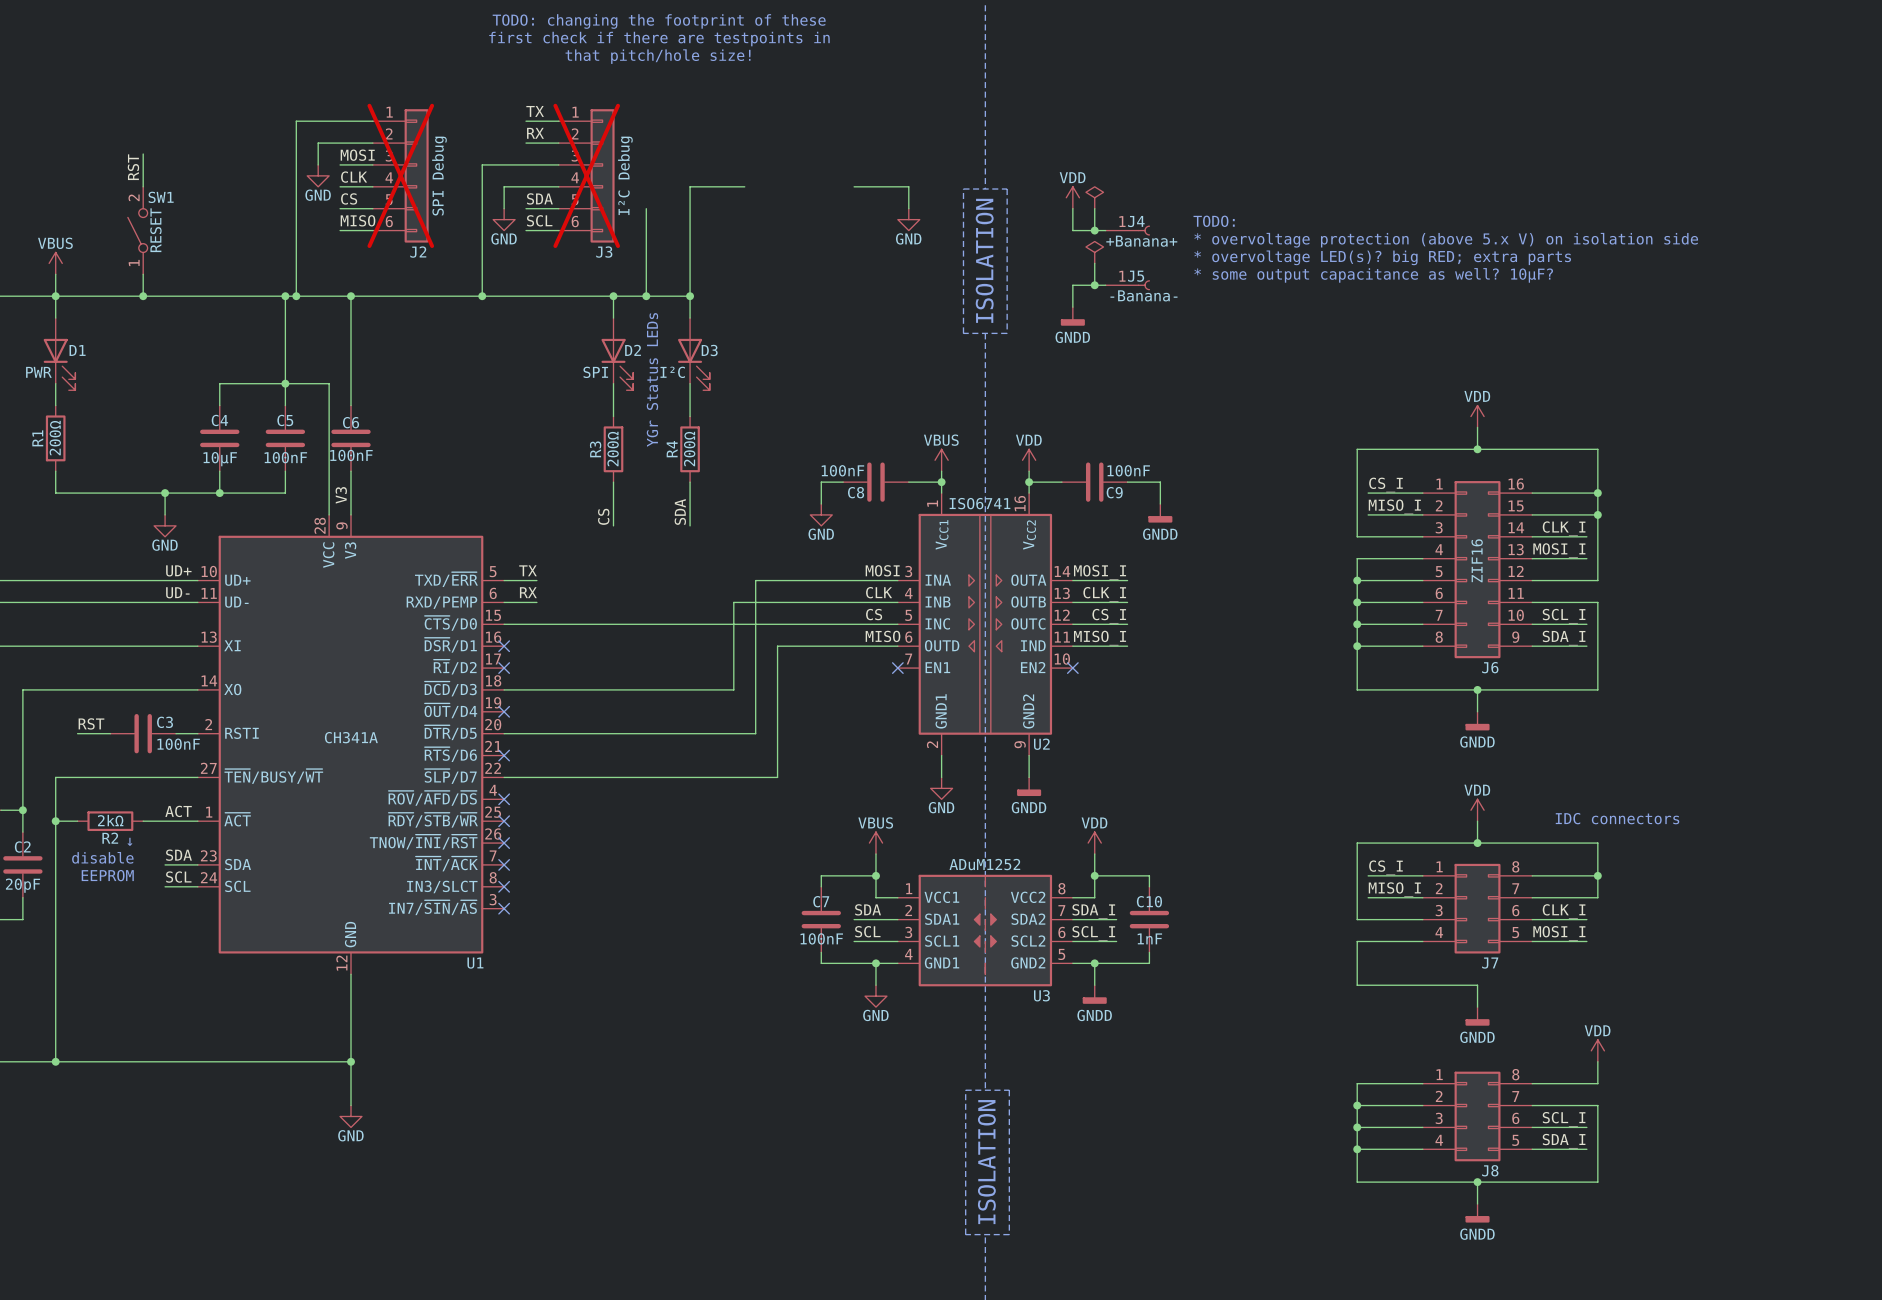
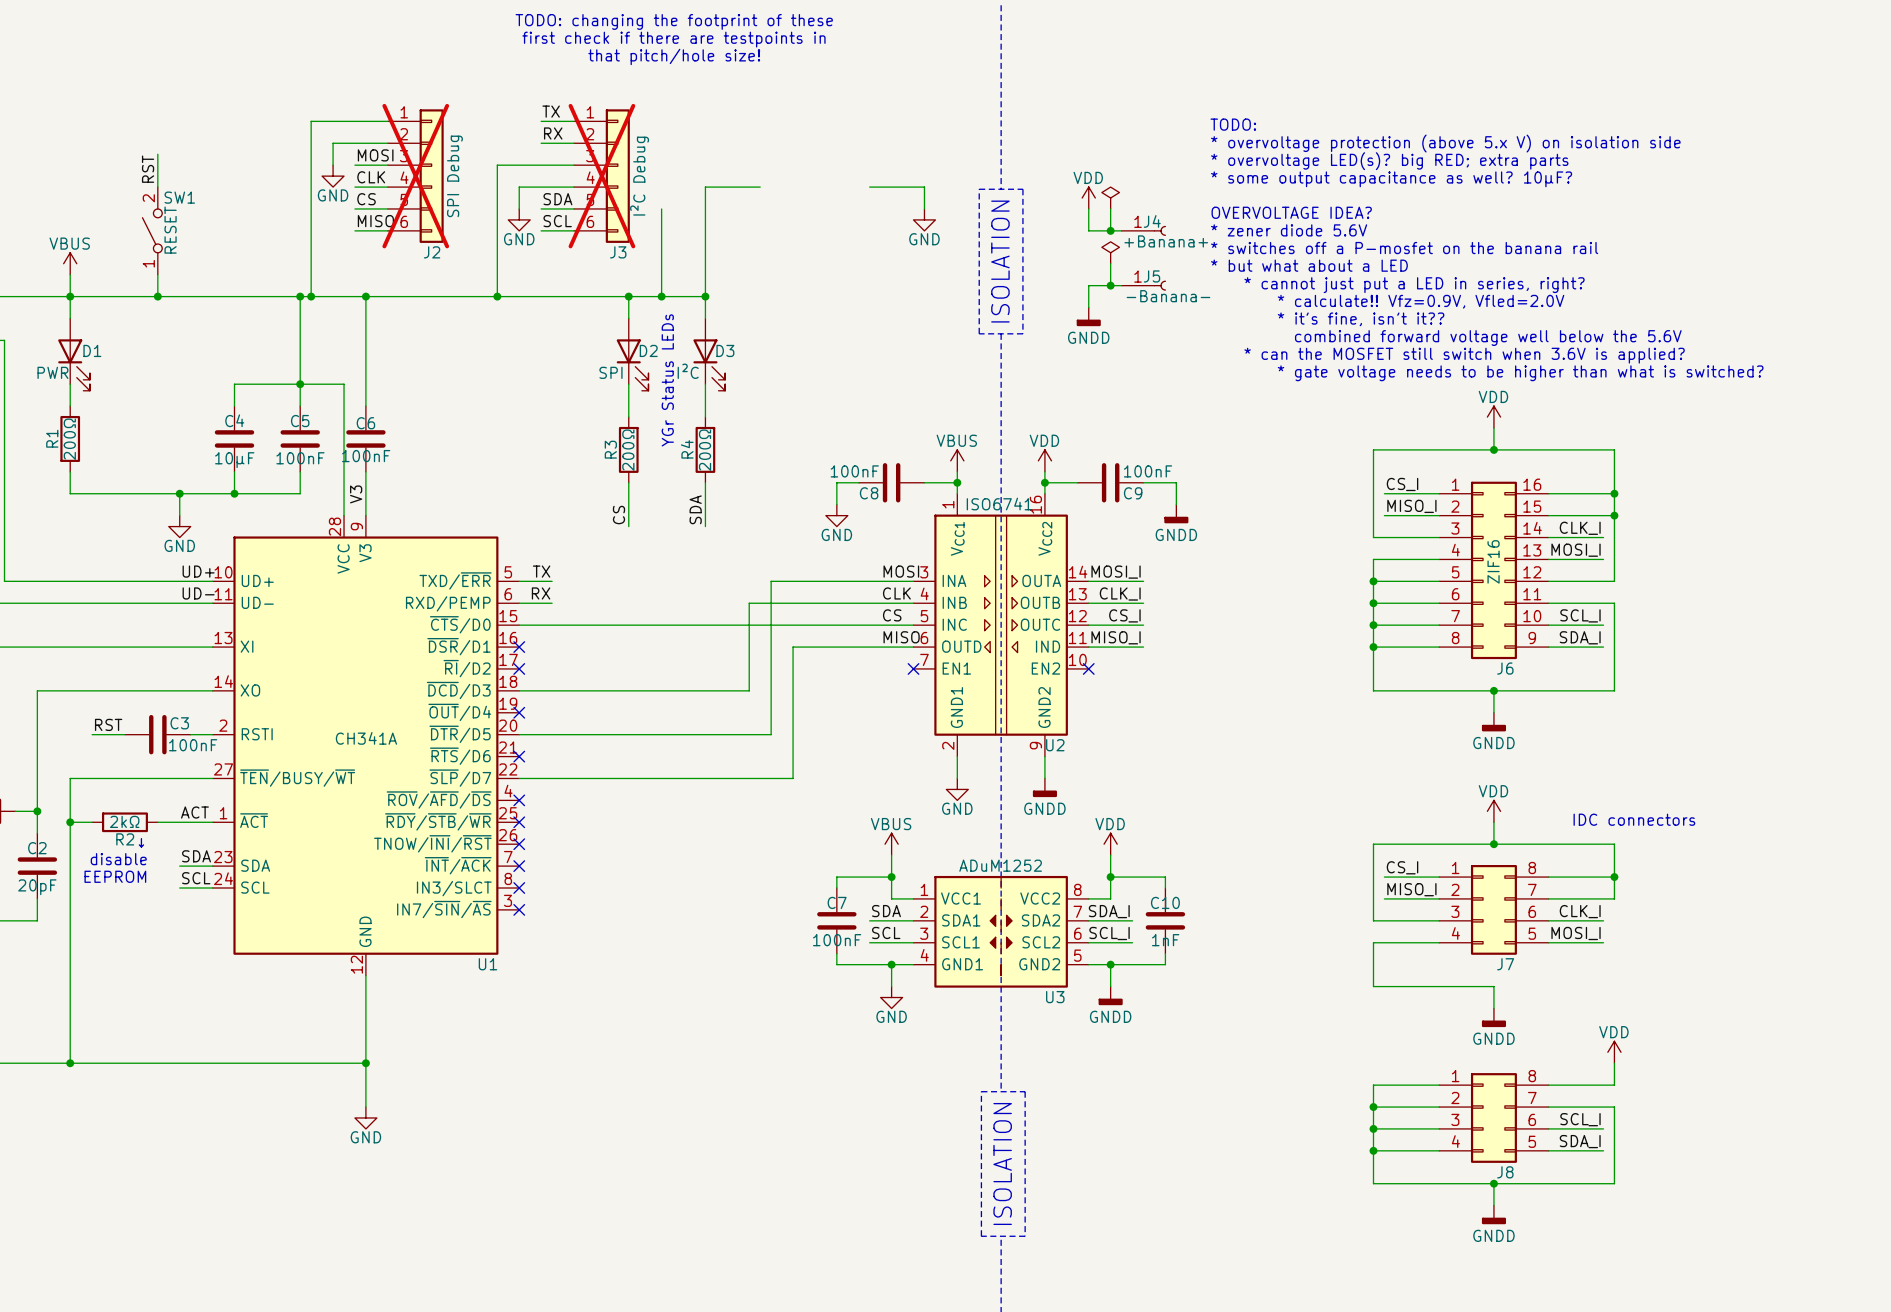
text: none -> OVERVOLTAGE IDEA? (1291, 212)
text position: TODO: (1214, 221) -> TODO: (1233, 124)
text: none -> * zener diode 5.6V (1289, 230)
text position: * overvoltage protection (above 5.x V) on isolation side (1446, 240) -> * overvoltage protection (above 5.x V) on isolation side (1445, 143)
text: none -> * switches off a P-mosfet on the banana rail (1404, 248)
text position: * overvoltage LED(s)? big RED; extra parts (1382, 257) -> * overvoltage LED(s)? big RED; extra parts (1389, 161)
text: none -> * but what about a LED (1309, 265)
text position: * some output capacitance as well? 10µF? (1373, 275) -> * some output capacitance as well? 10µF? (1391, 179)
text: none -> * cannot just put a LED in series, right? (1414, 285)
text: none -> * calculate!! Vfz=0.9V, Vfled=2.0V (1421, 301)
text: none -> * it's fine, isn't it?? (1361, 319)
text: none -> combined forward voltage well below the 5.6V (1488, 338)
text: none -> * can the MOSFET still switch when 3.6V is applied? (1464, 355)
text: none -> * gate voltage needs to be higher than what is switched? (1520, 373)

